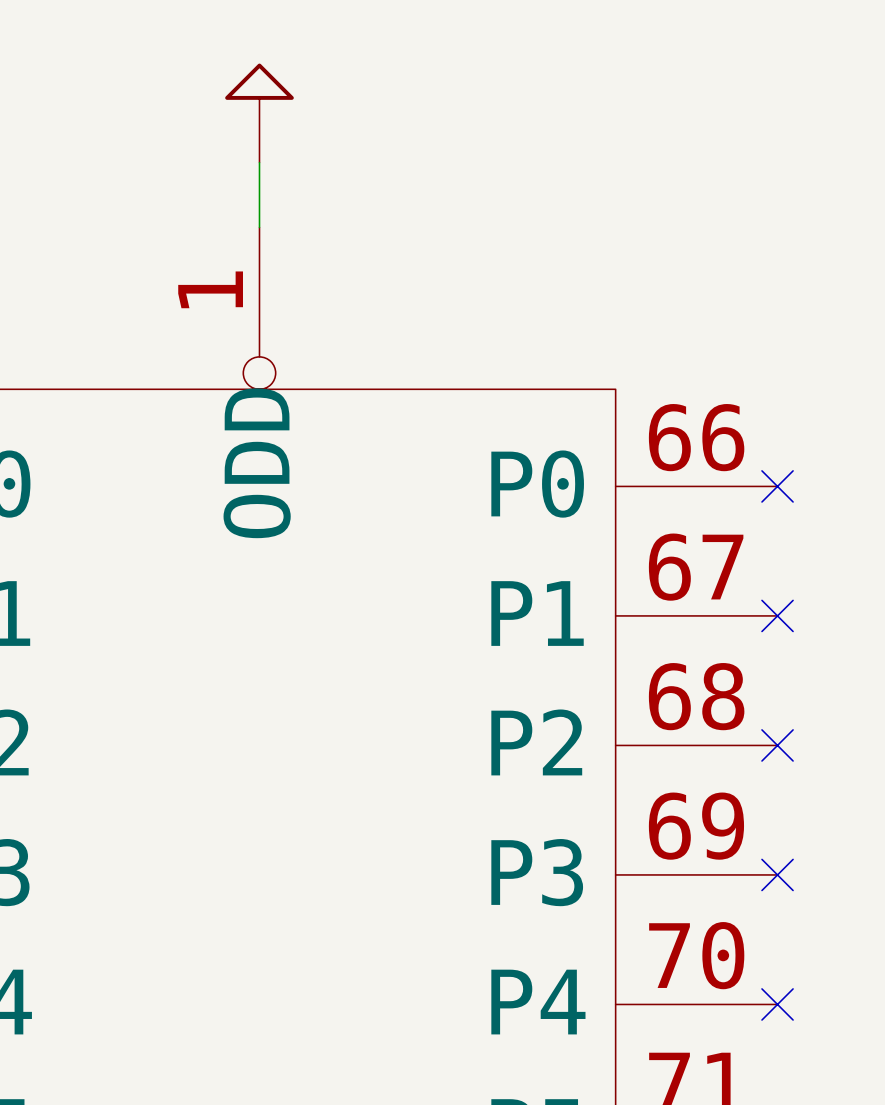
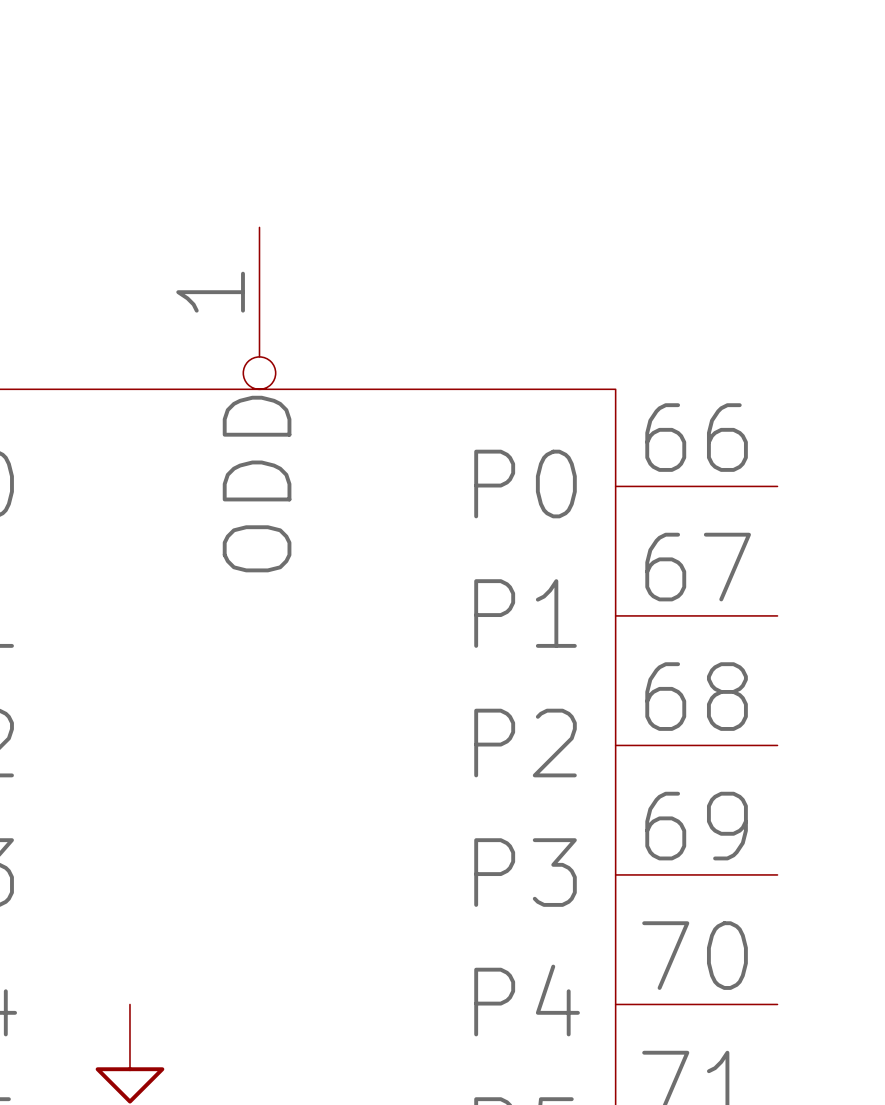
power symbol: (259, 113) -> none
wire: (259, 162) (259, 227) -> none
no-connect mark: (777, 486) -> none
no-connect mark: (777, 615) -> none
no-connect mark: (777, 745) -> none
no-connect mark: (777, 874) -> none
no-connect mark: (777, 1004) -> none
power symbol: none -> (129, 1054)

